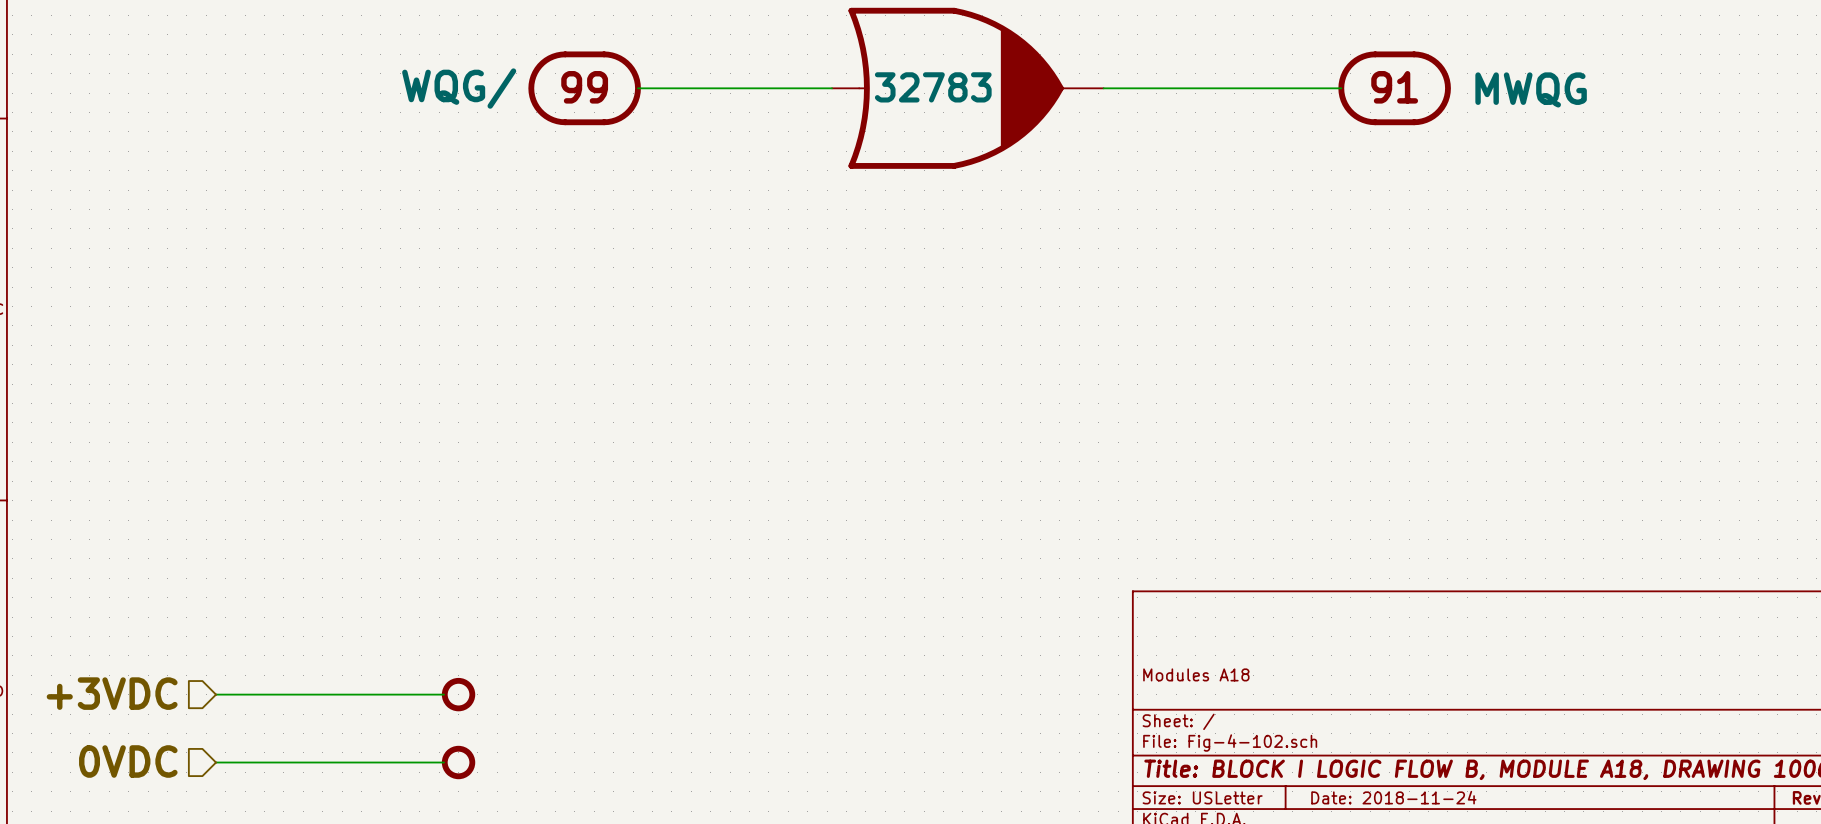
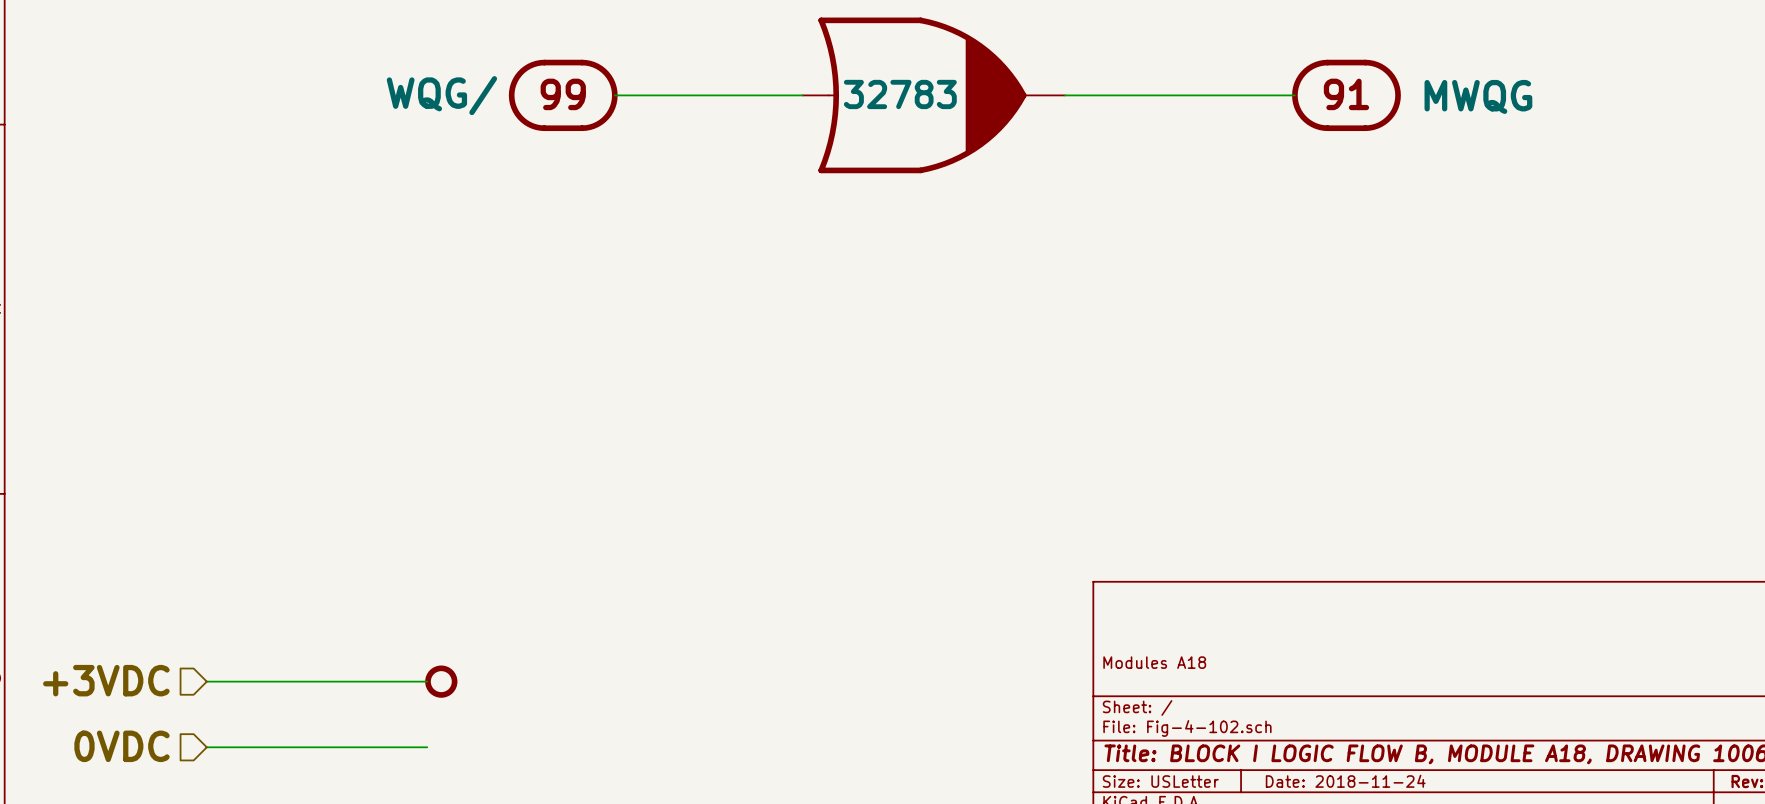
part: (458, 762) -> none

